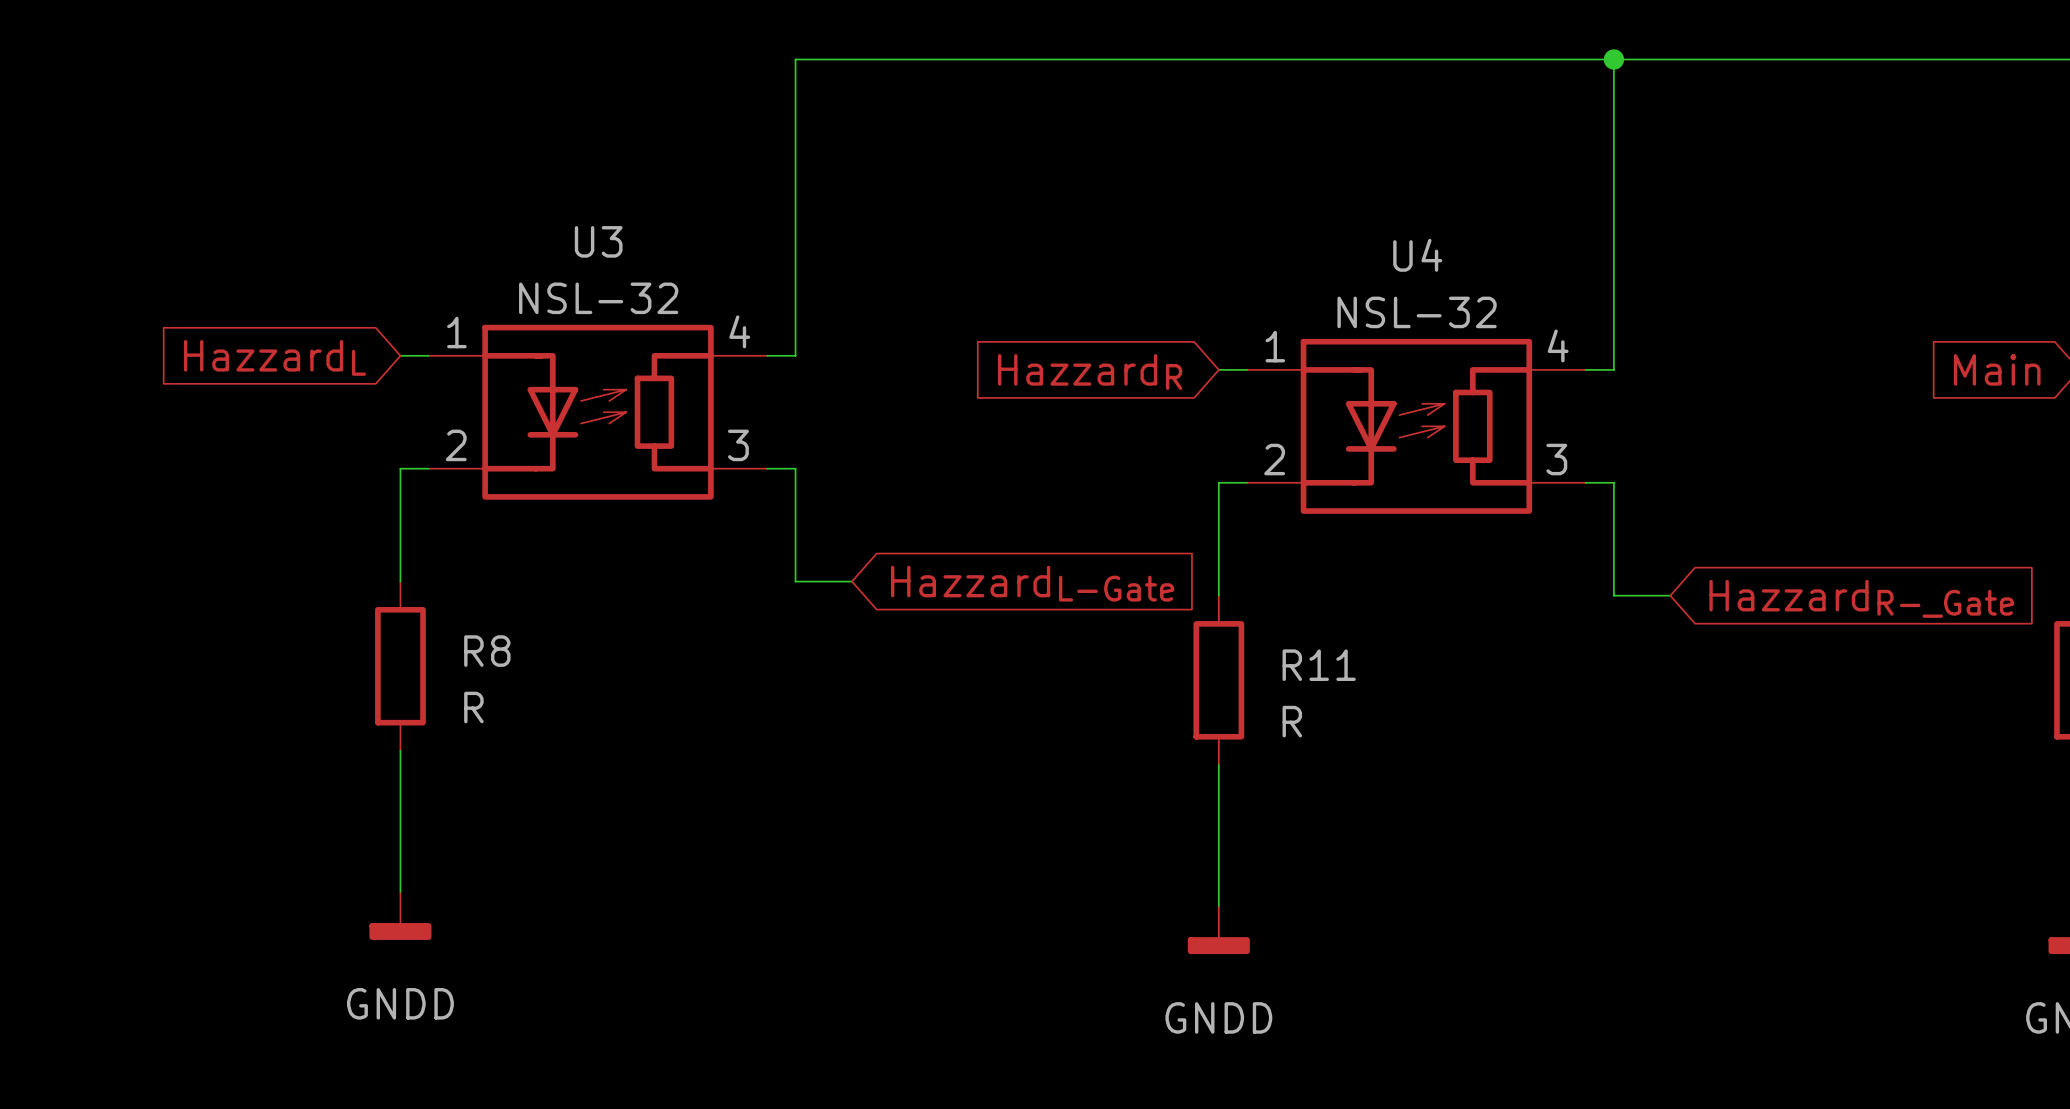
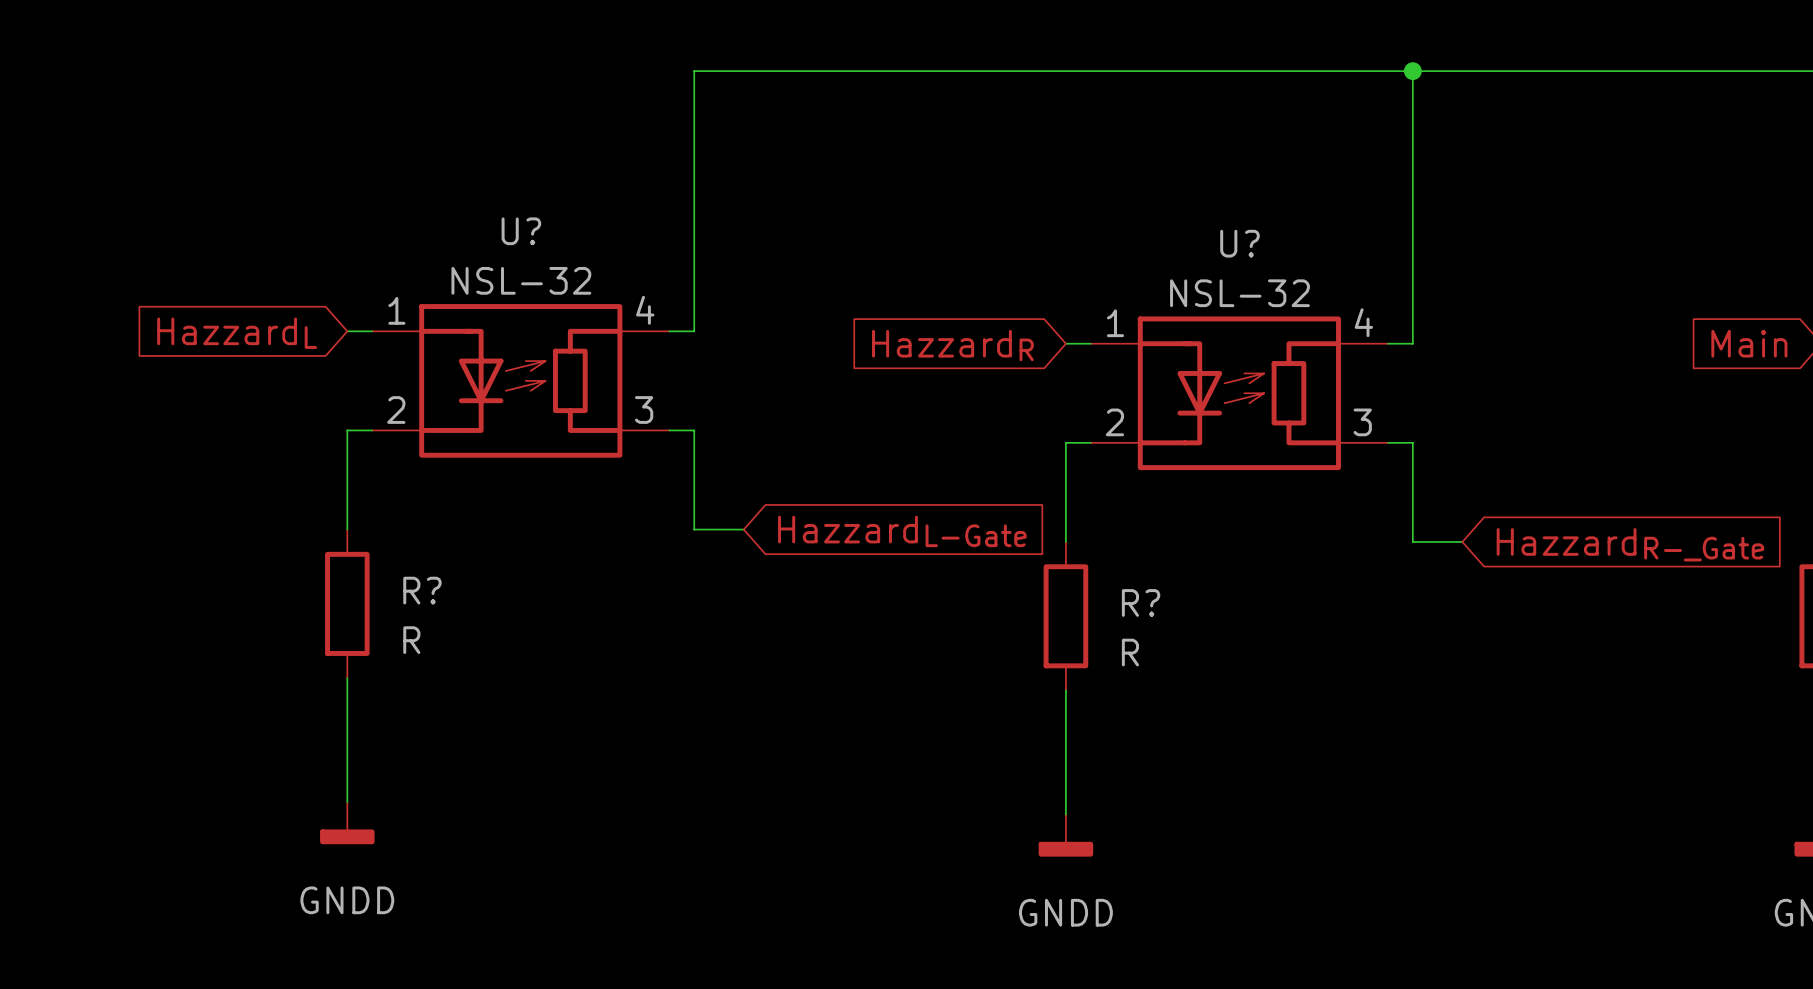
U3 name: U3 (598, 241) -> U? (521, 231)
U4 name: U4 (1417, 255) -> U? (1239, 243)
R8 name: R8 (487, 651) -> R? (422, 590)
R11 name: R11 (1319, 665) -> R? (1141, 602)

